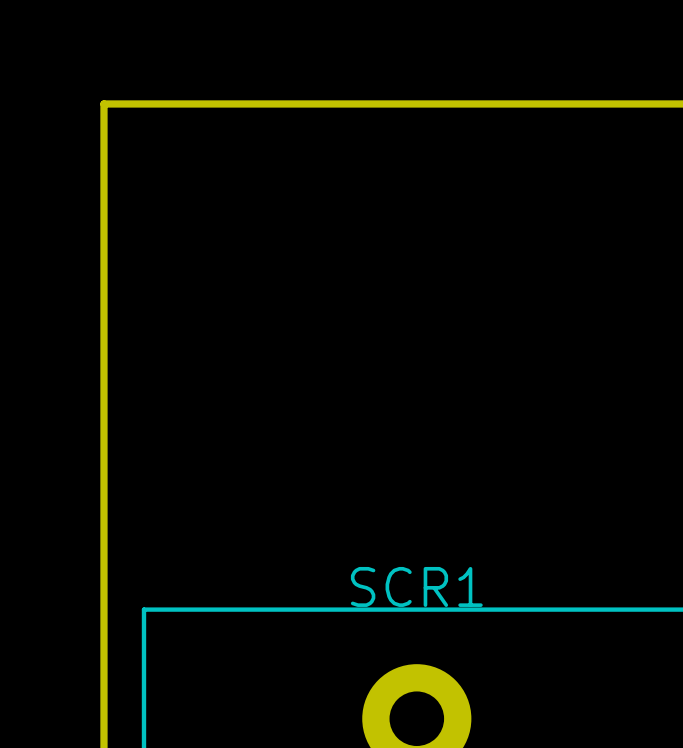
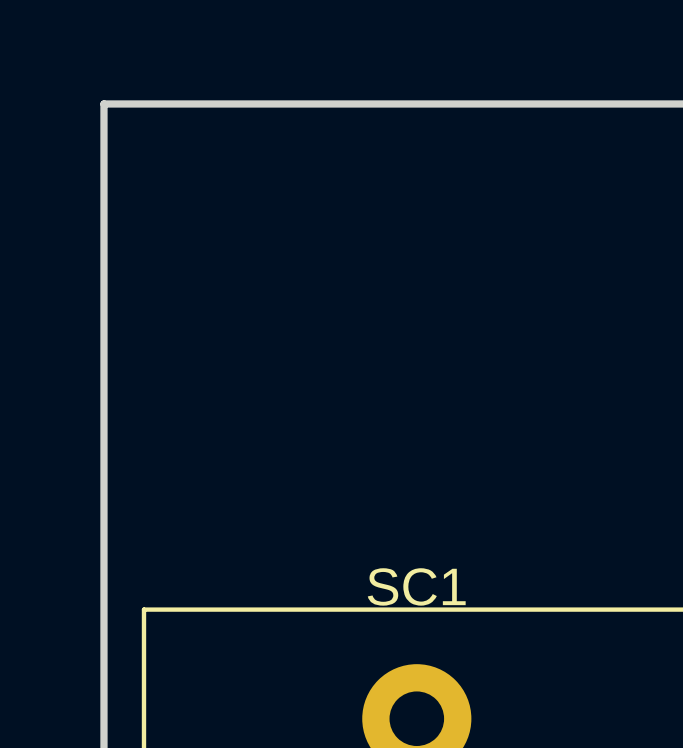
SCR1 name: SCR1 (416, 586) -> SC1 (416, 586)

